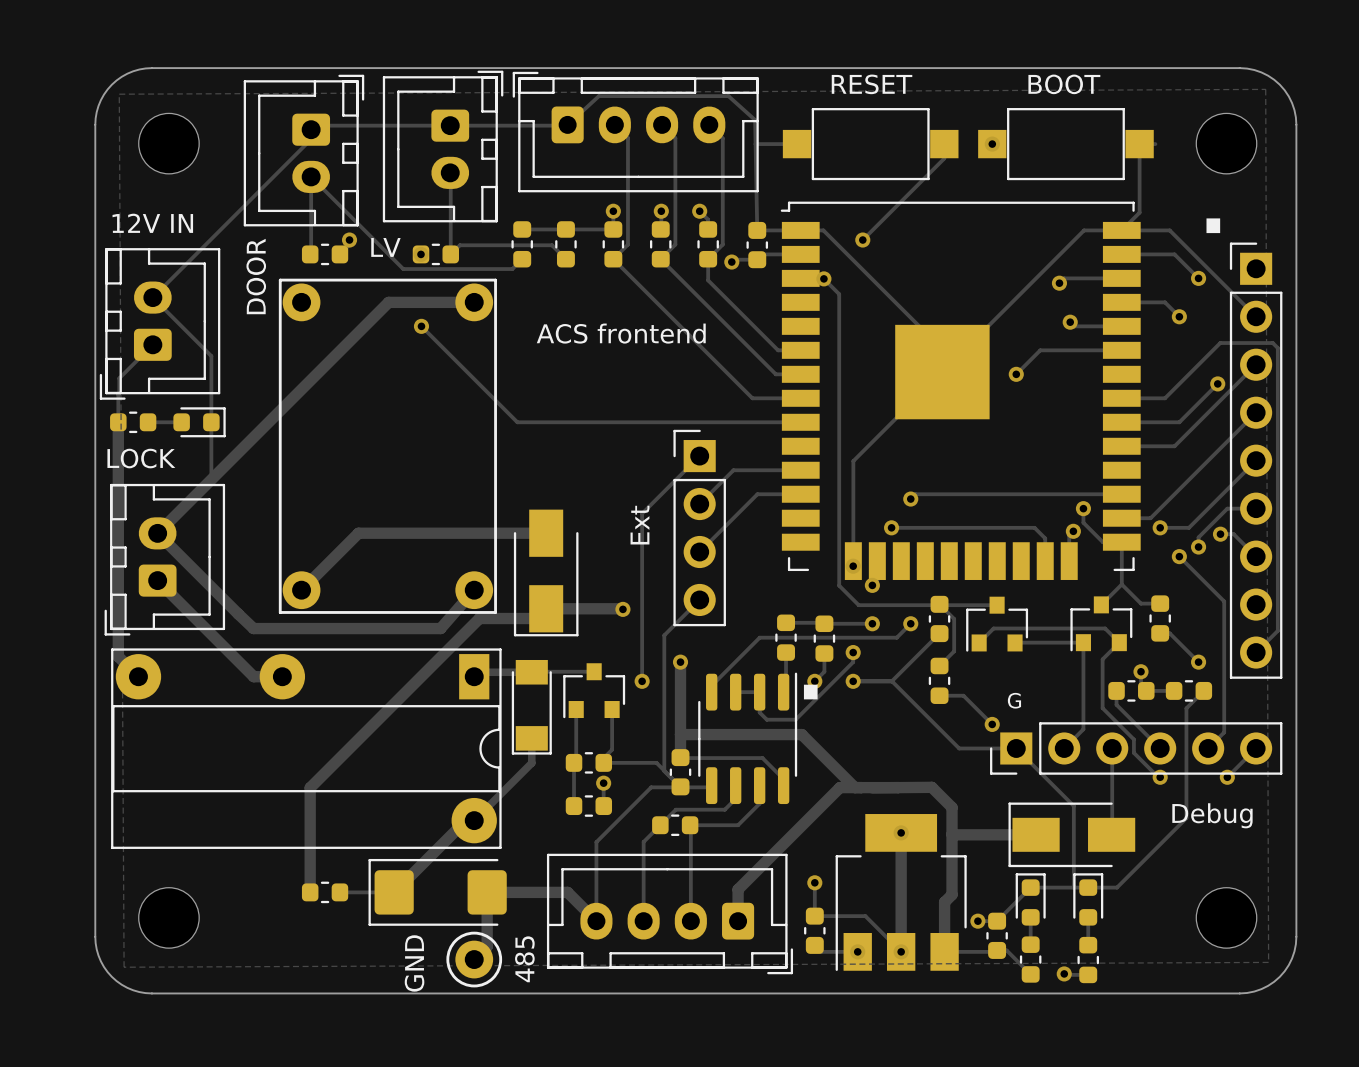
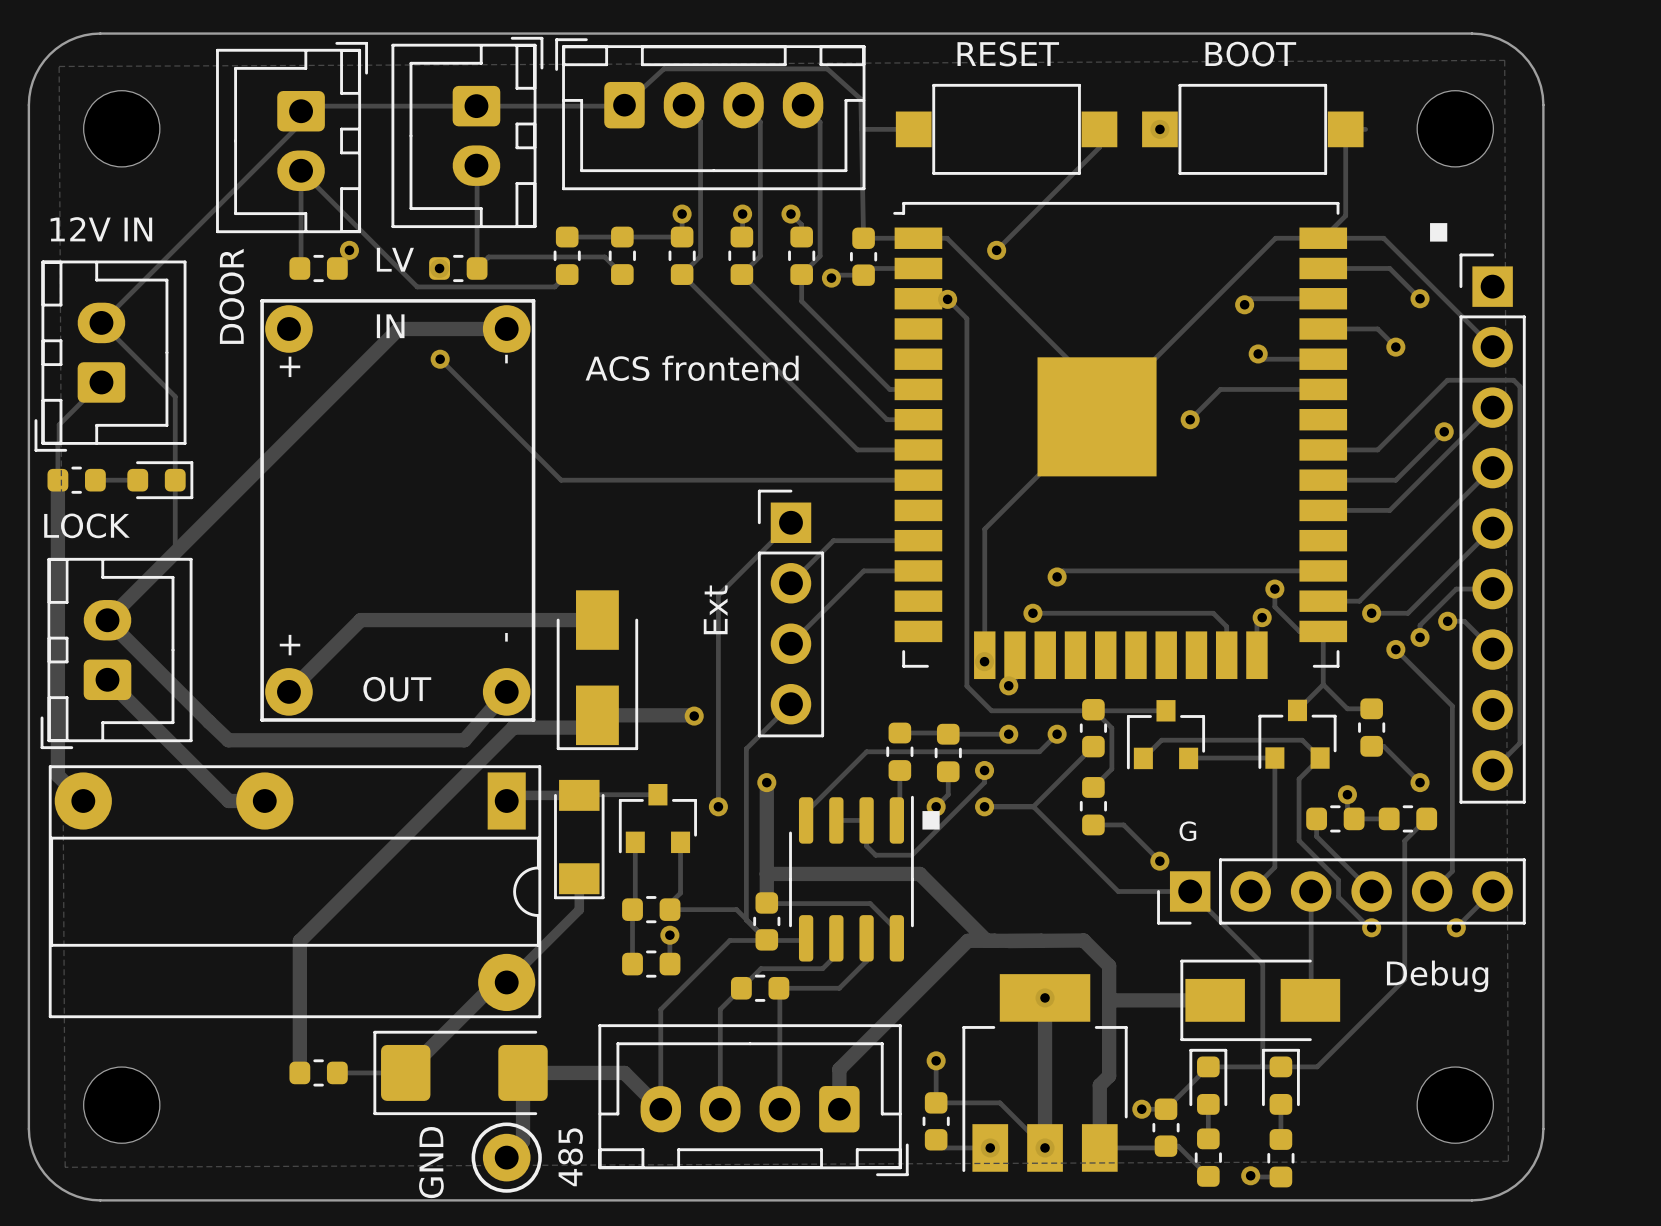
part text: none -> IN (390, 326)
part text: none -> - (506, 359)
part text: none -> + (290, 366)
part text: none -> - (506, 637)
part text: none -> + (290, 645)
part text: none -> OUT (397, 689)

